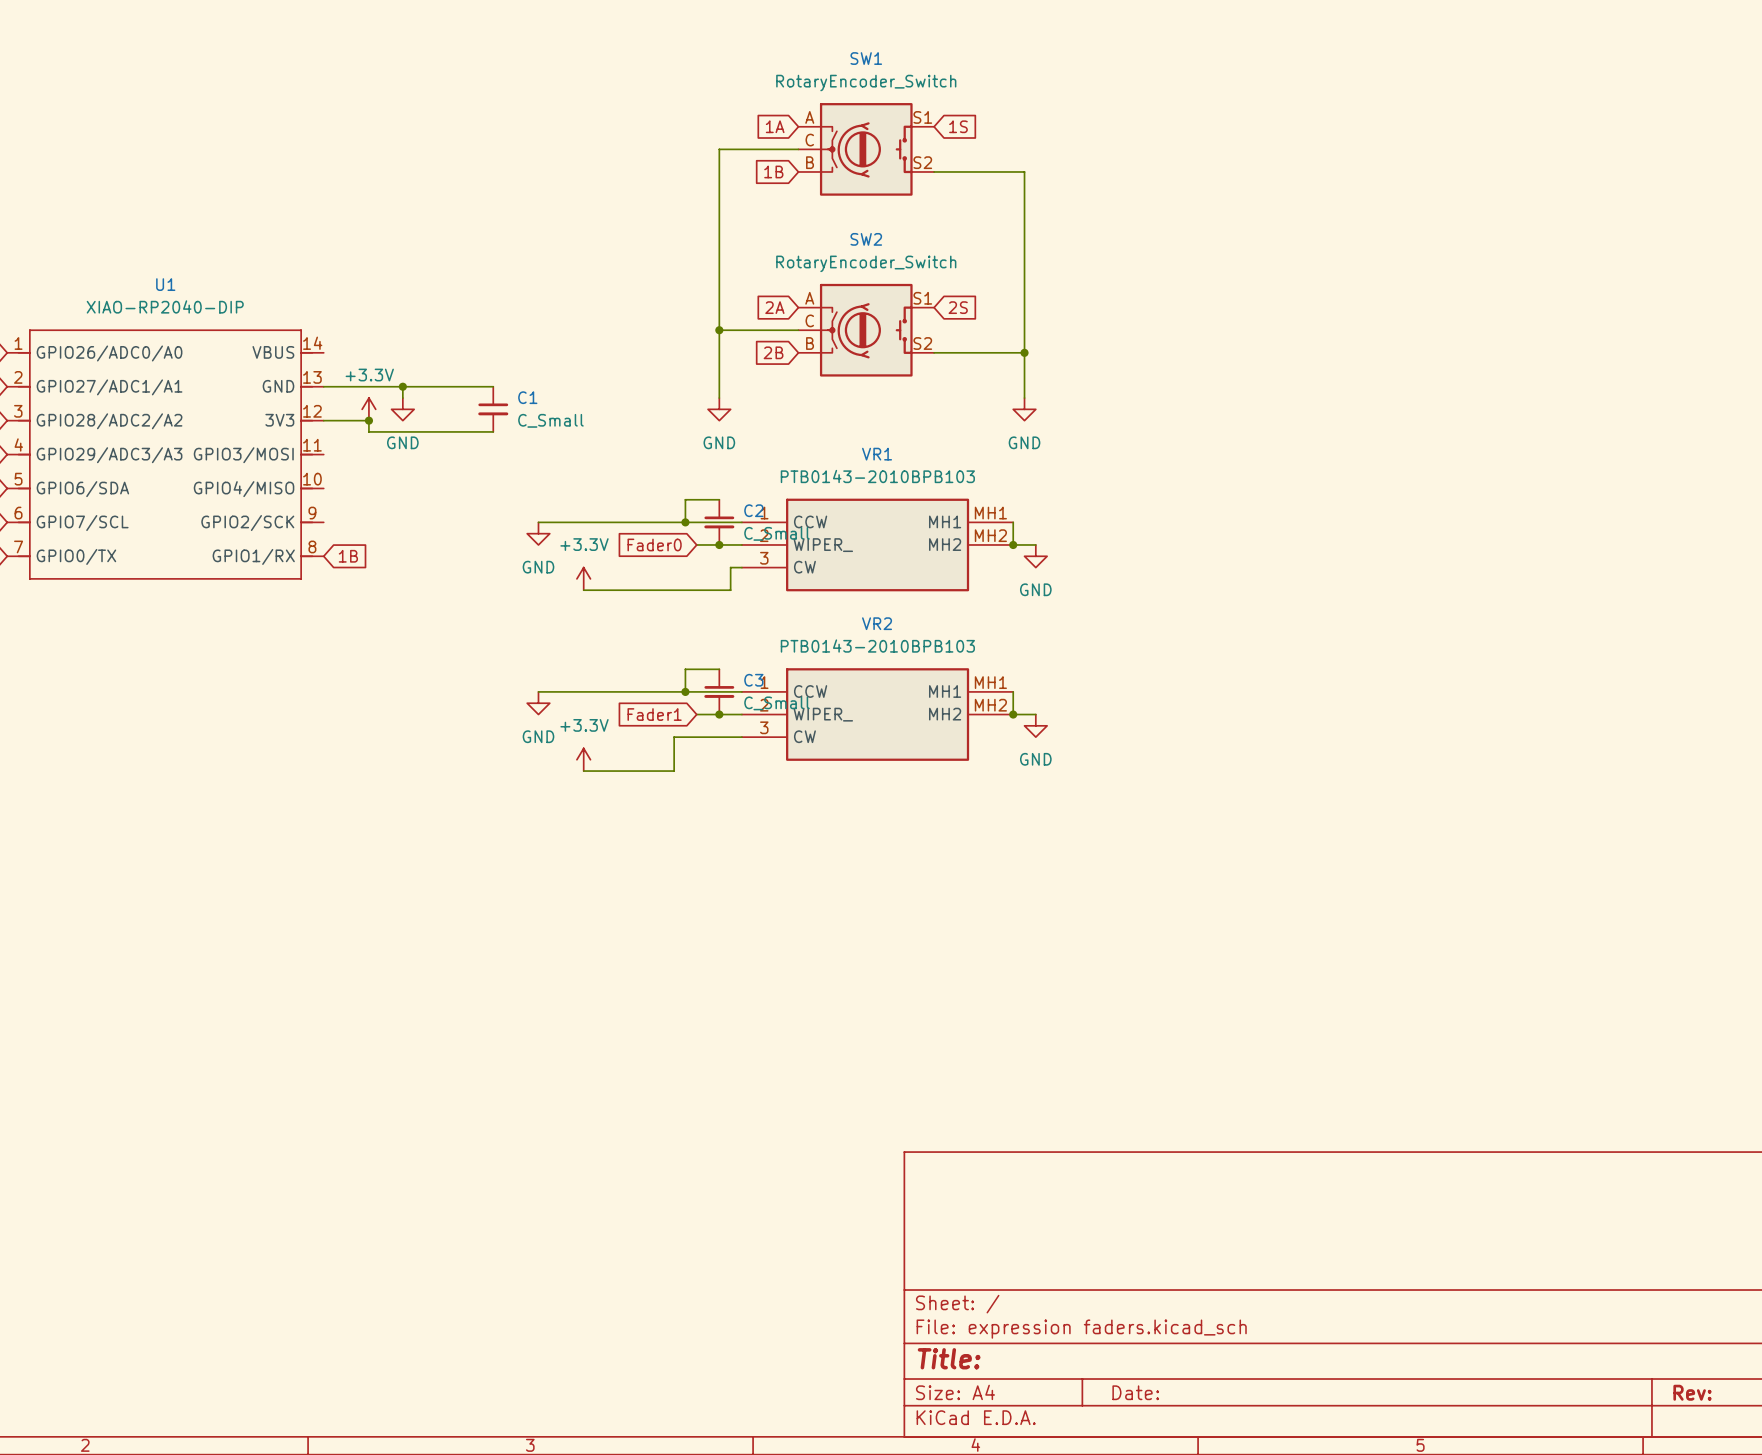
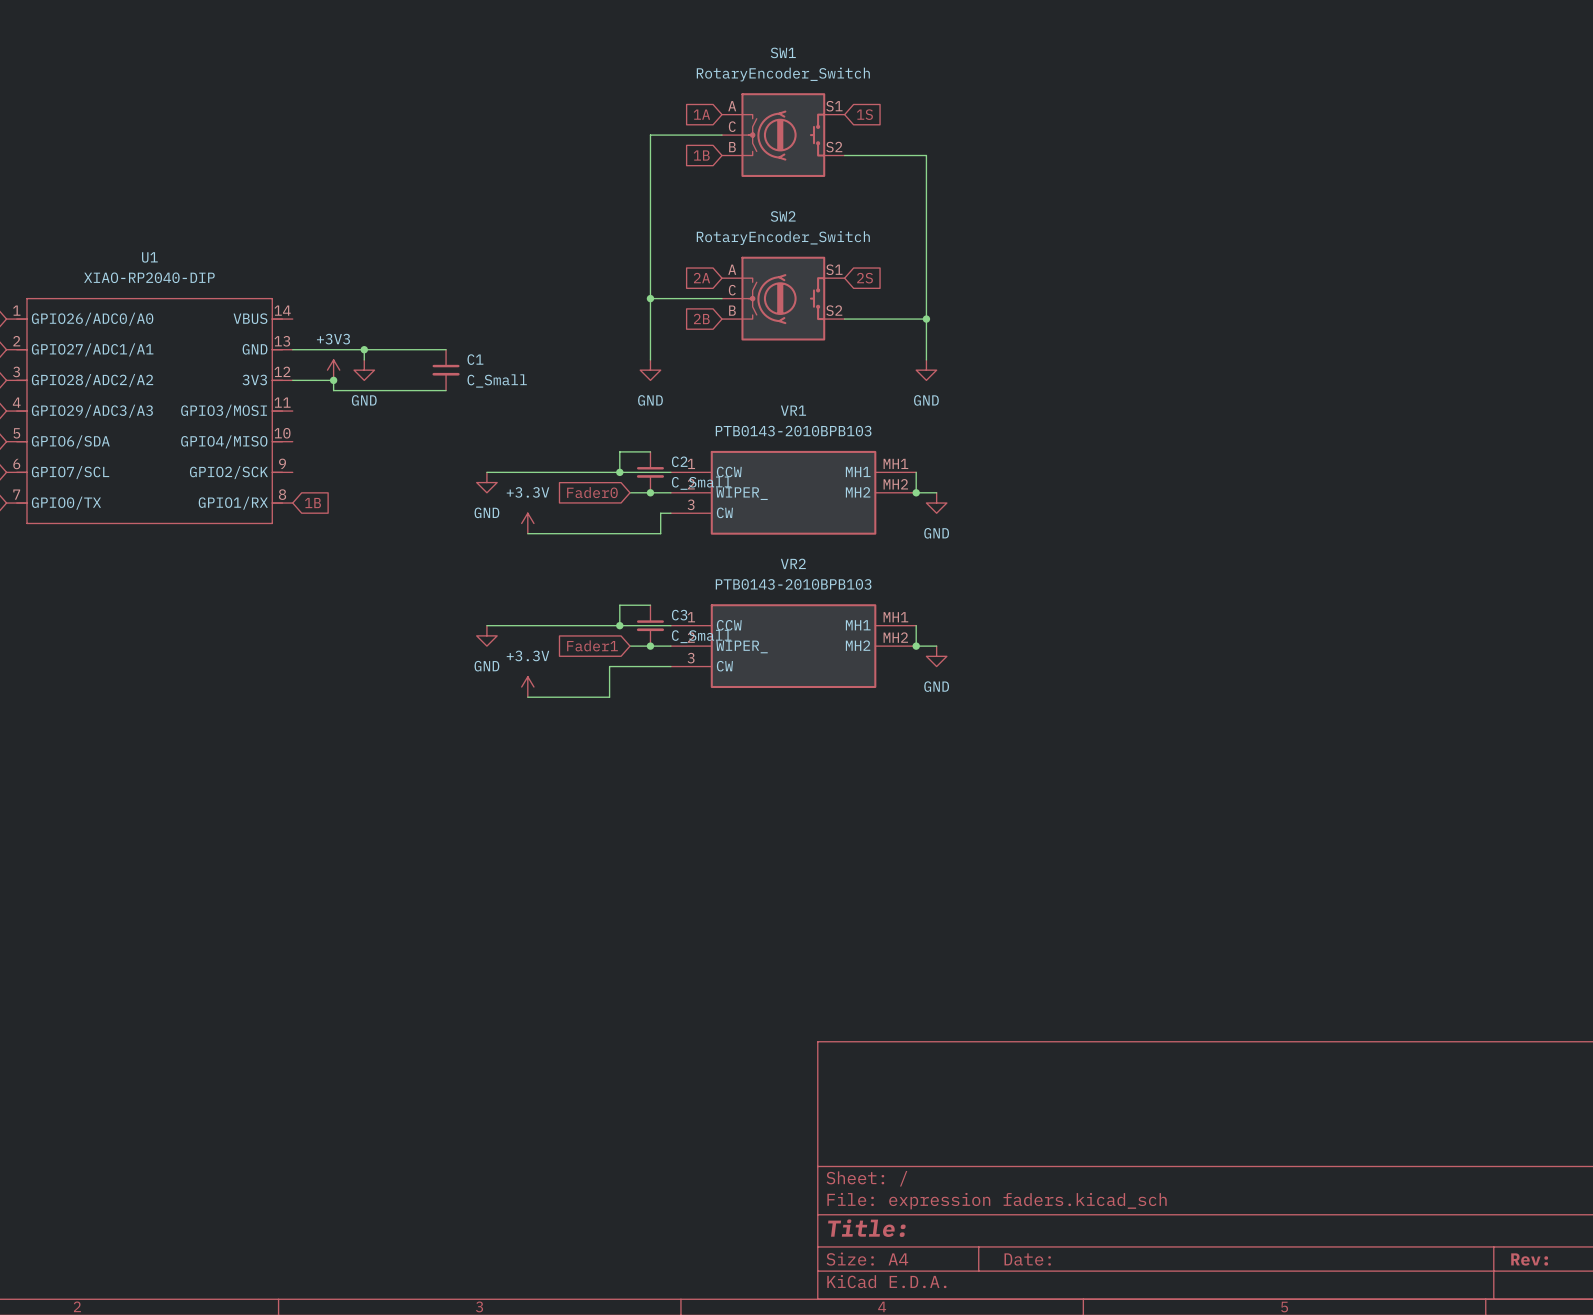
power symbol: +3.3V (368, 409) -> +3V3 (333, 370)

